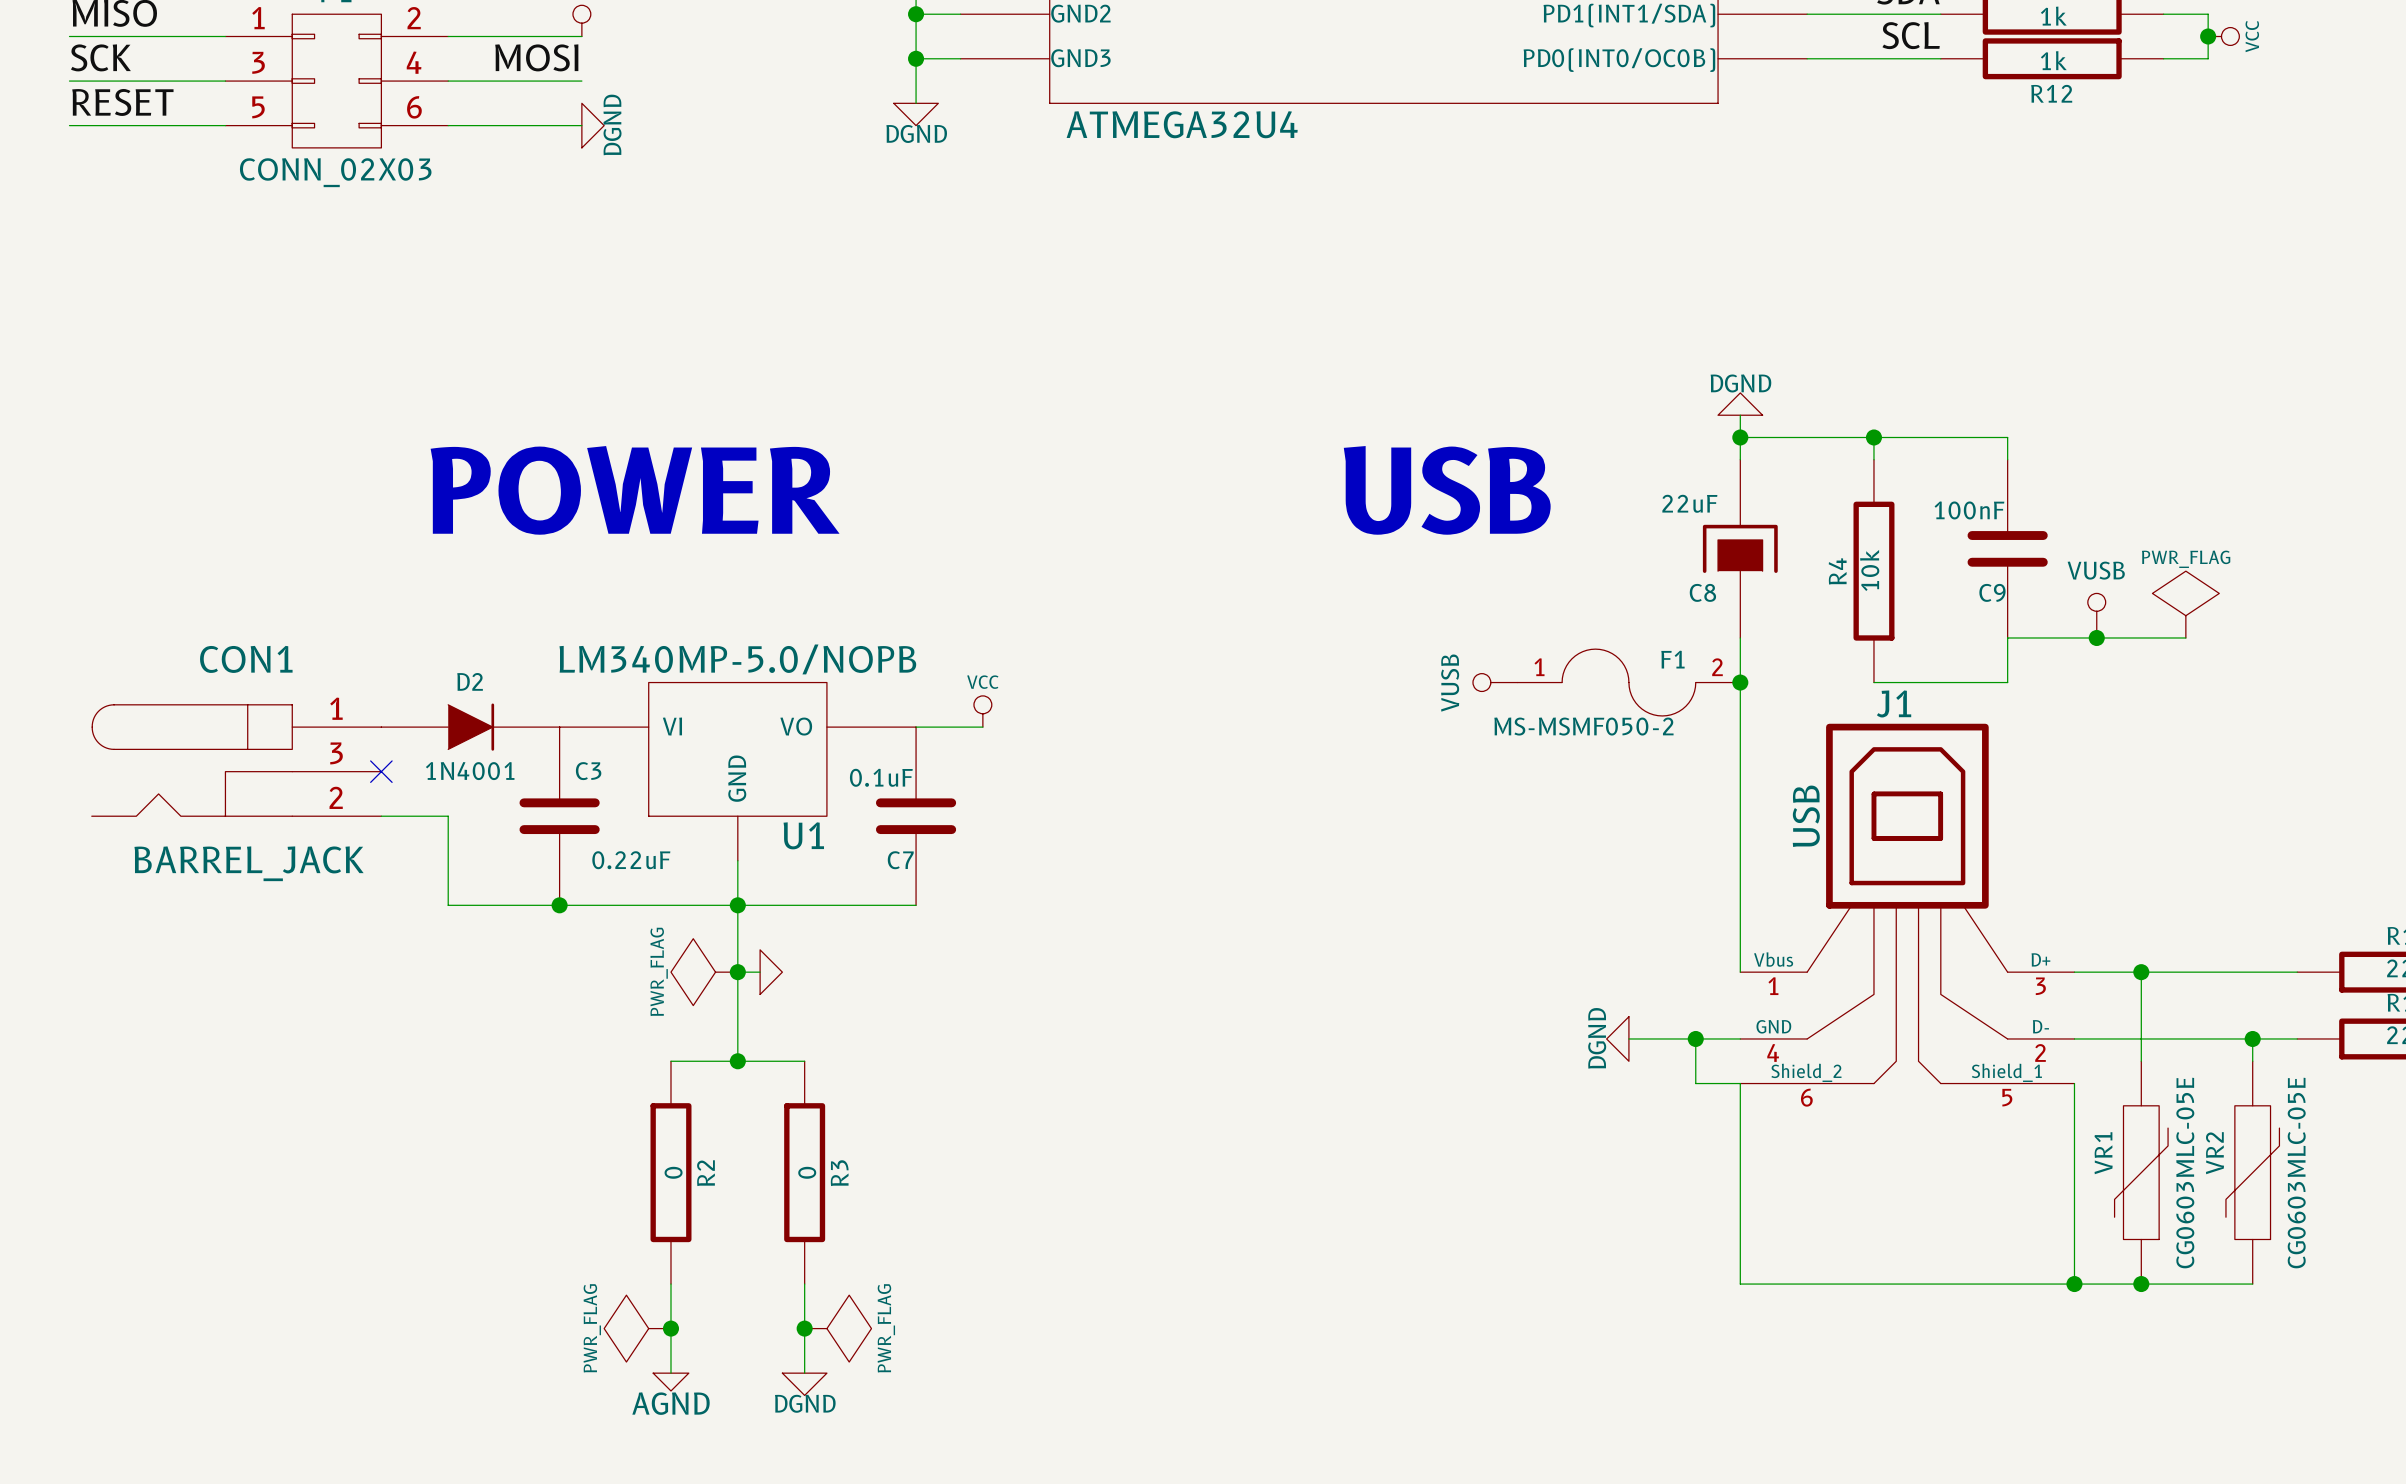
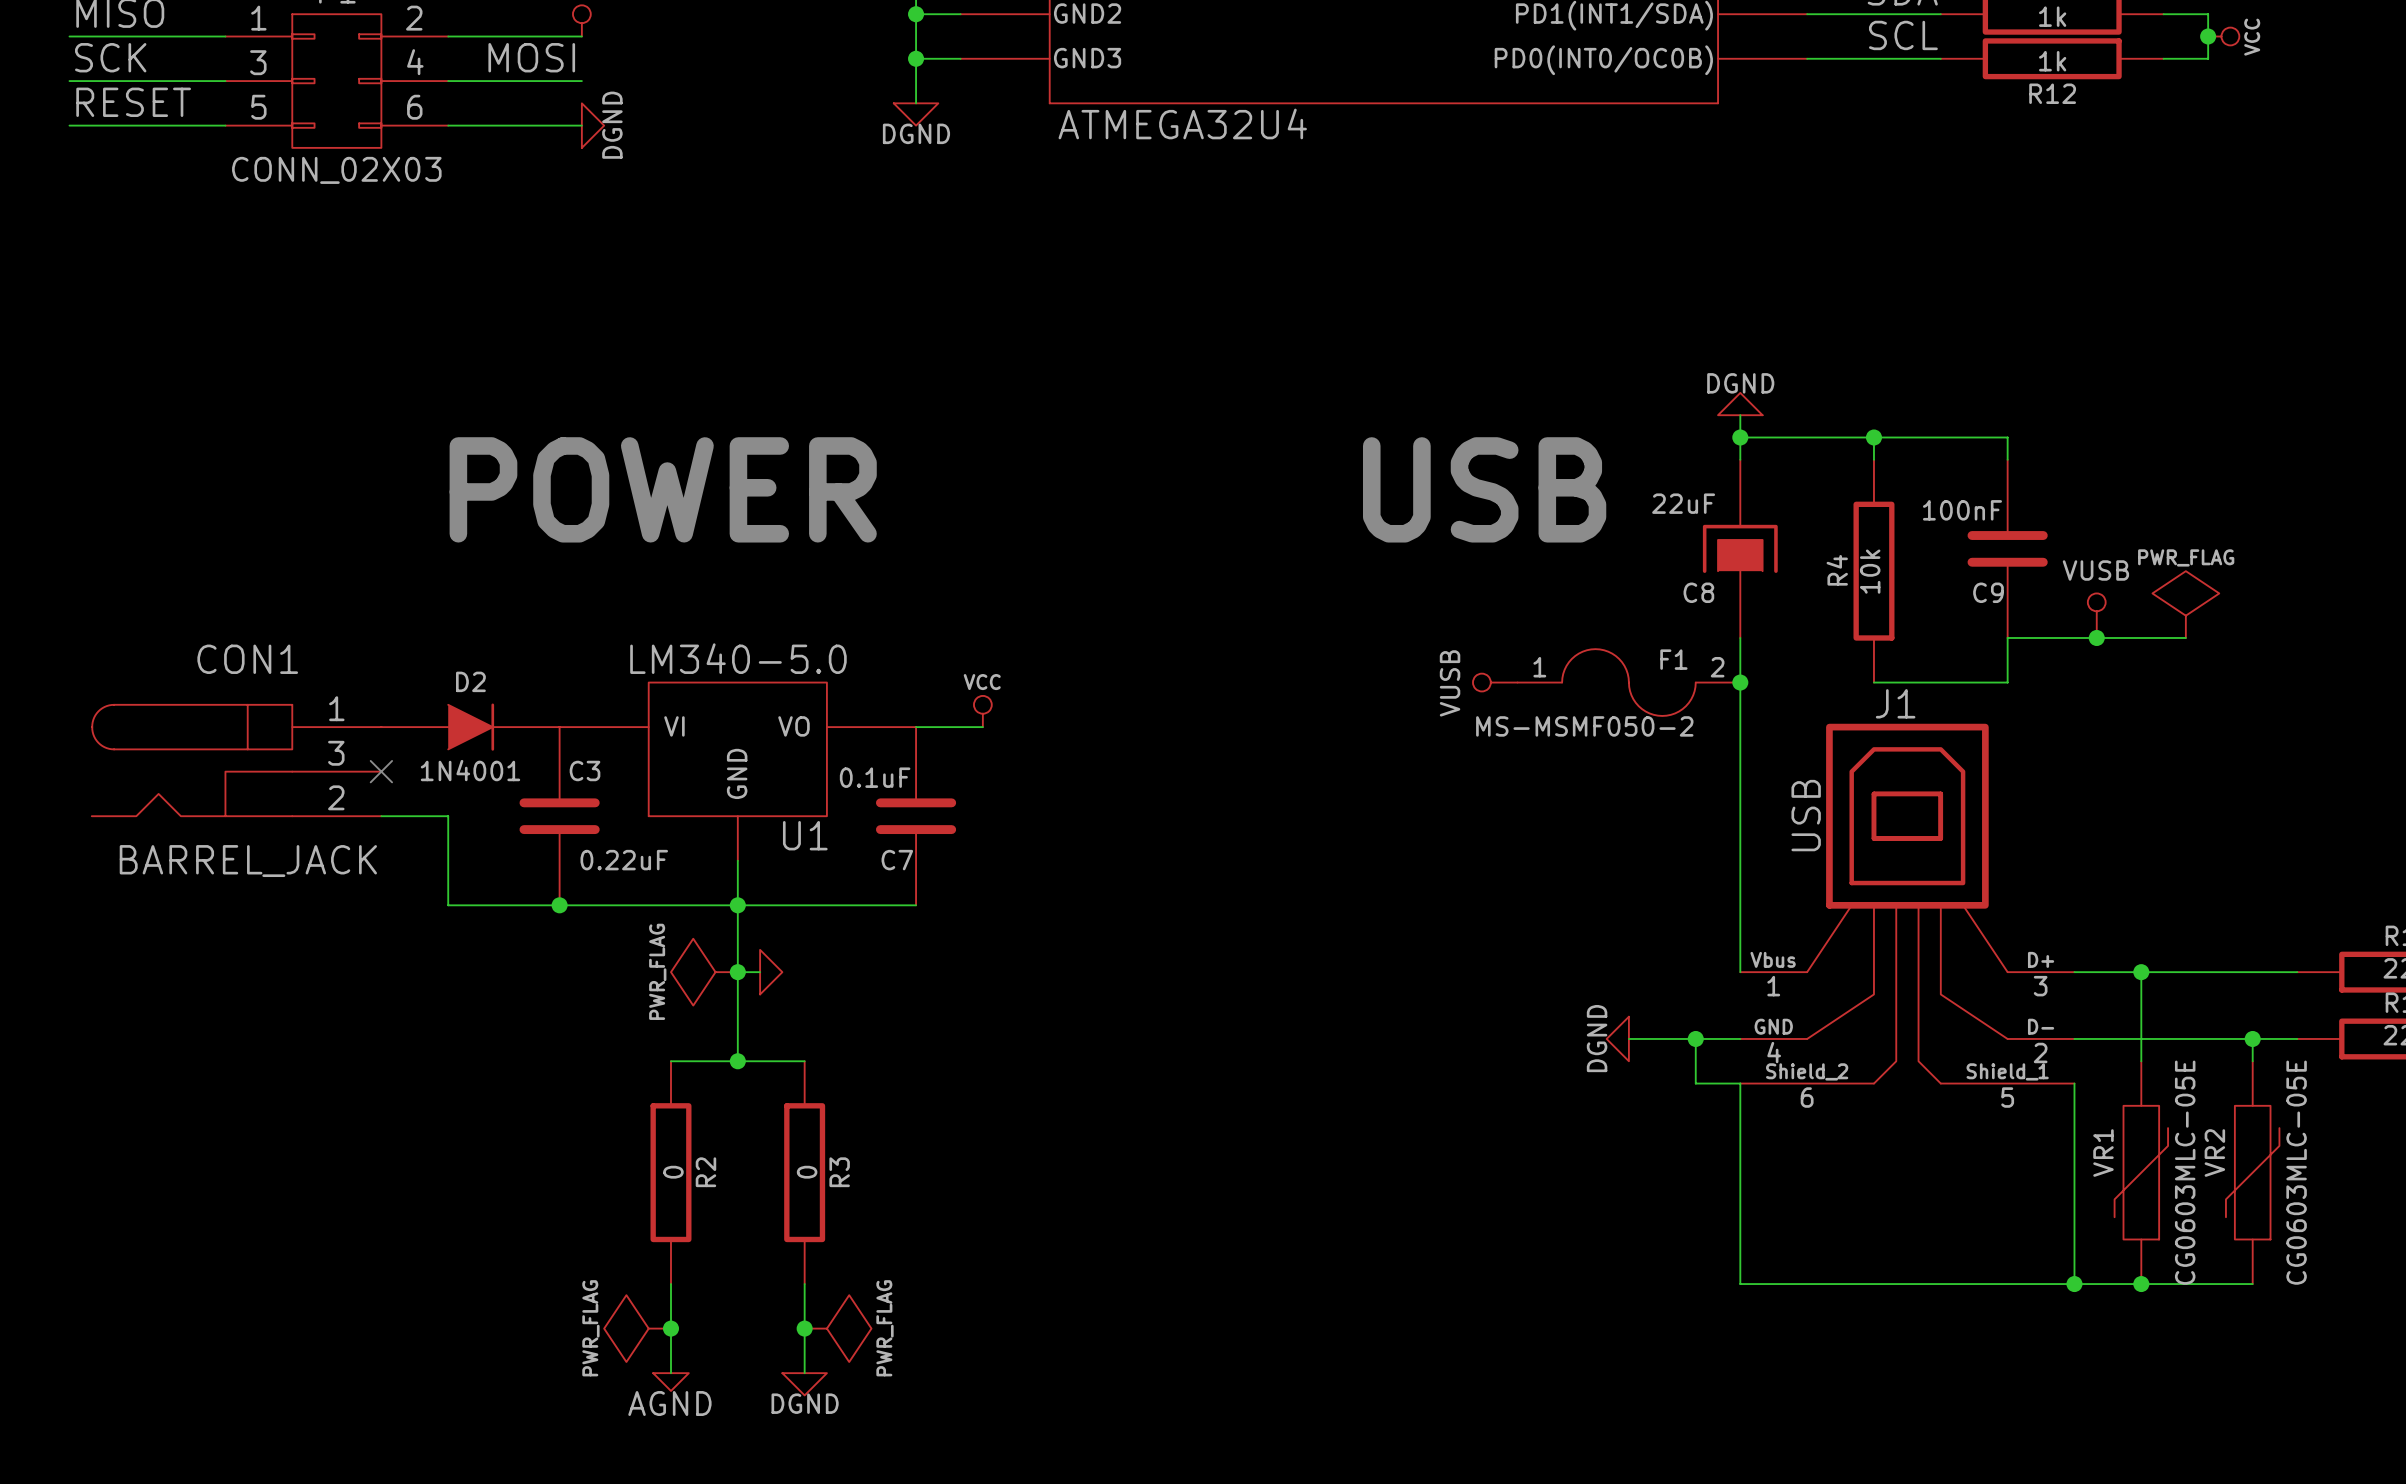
U1 value: LM340MP-5.0/NOPB (737, 659) -> LM340-5.0 (738, 658)

